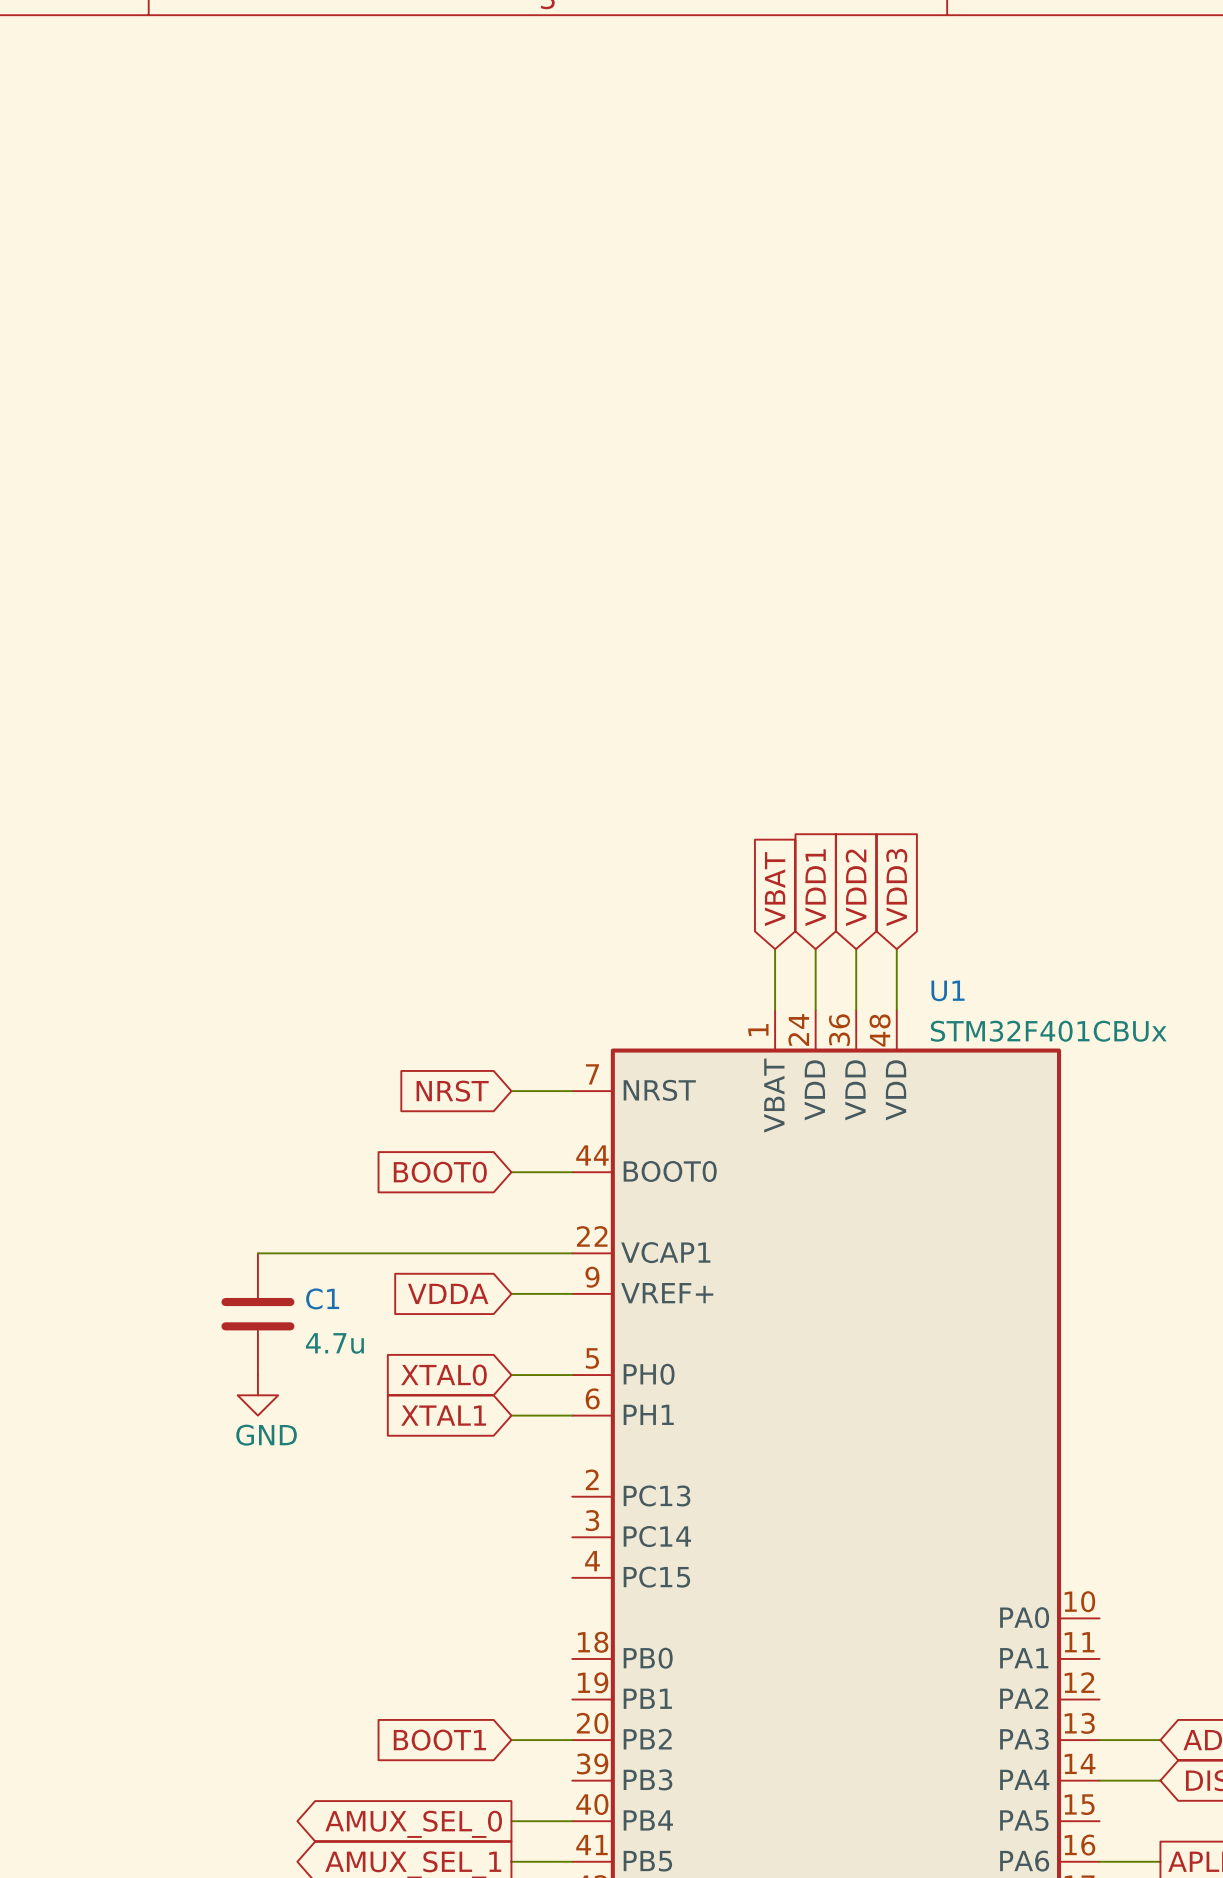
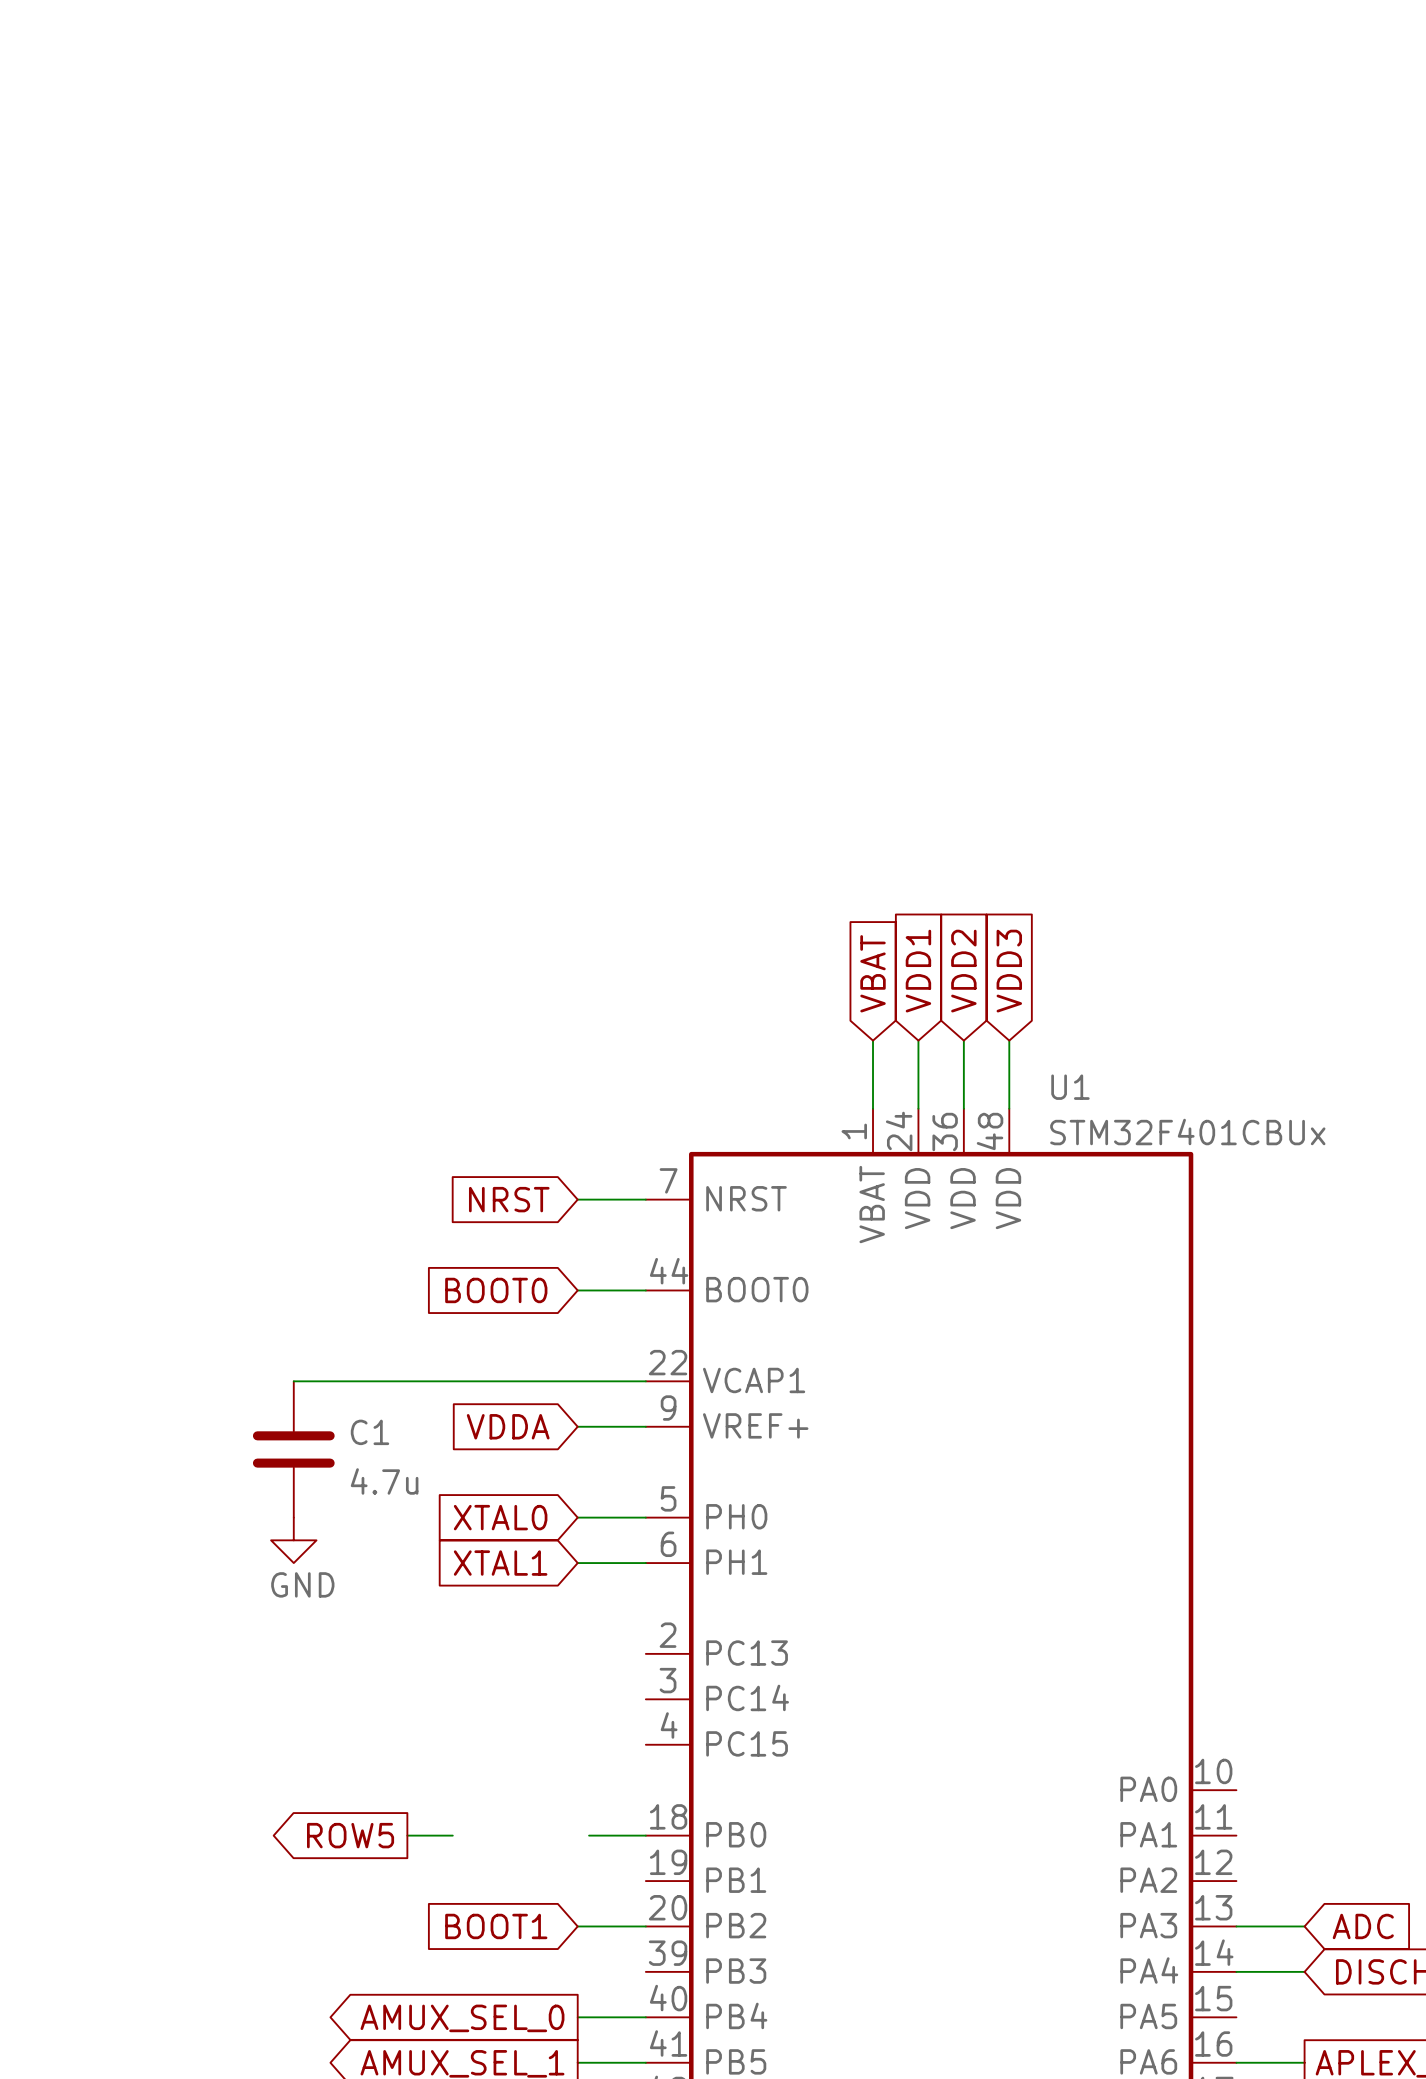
global label: none -> ROW5 (350, 1835)
wire: none -> (407, 1835) (452, 1835)
wire: none -> (589, 1835) (645, 1835)

